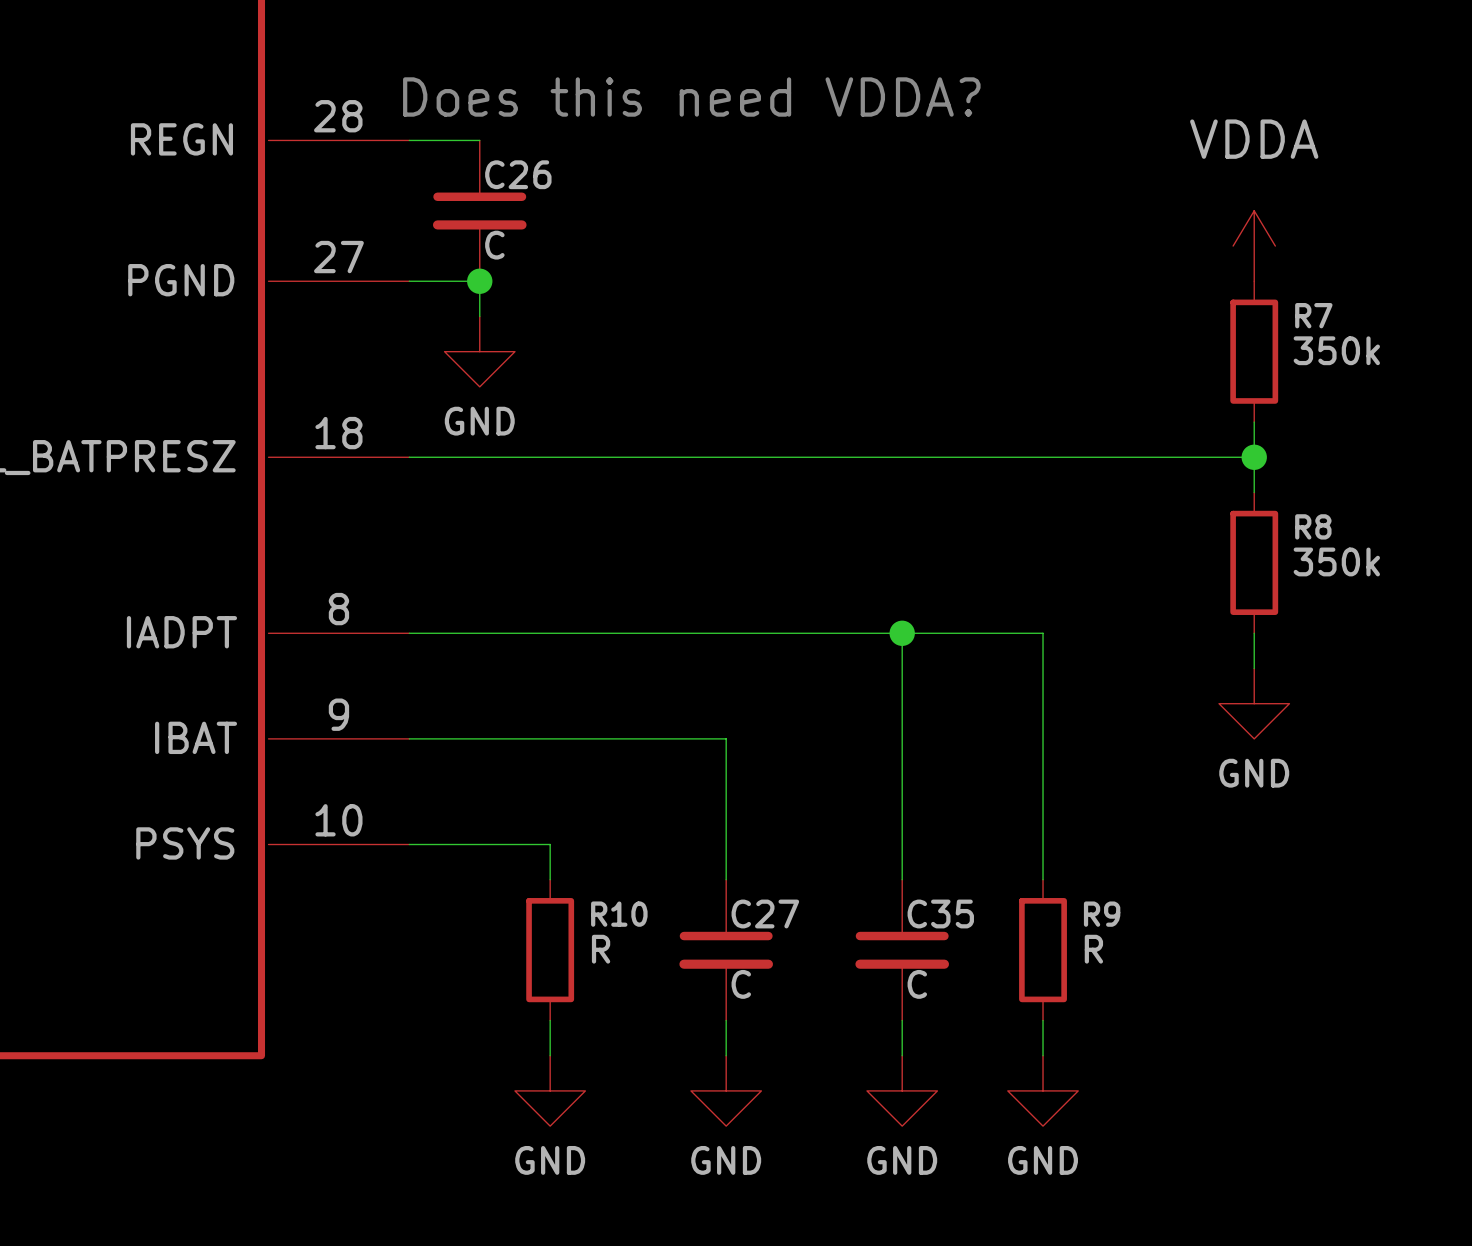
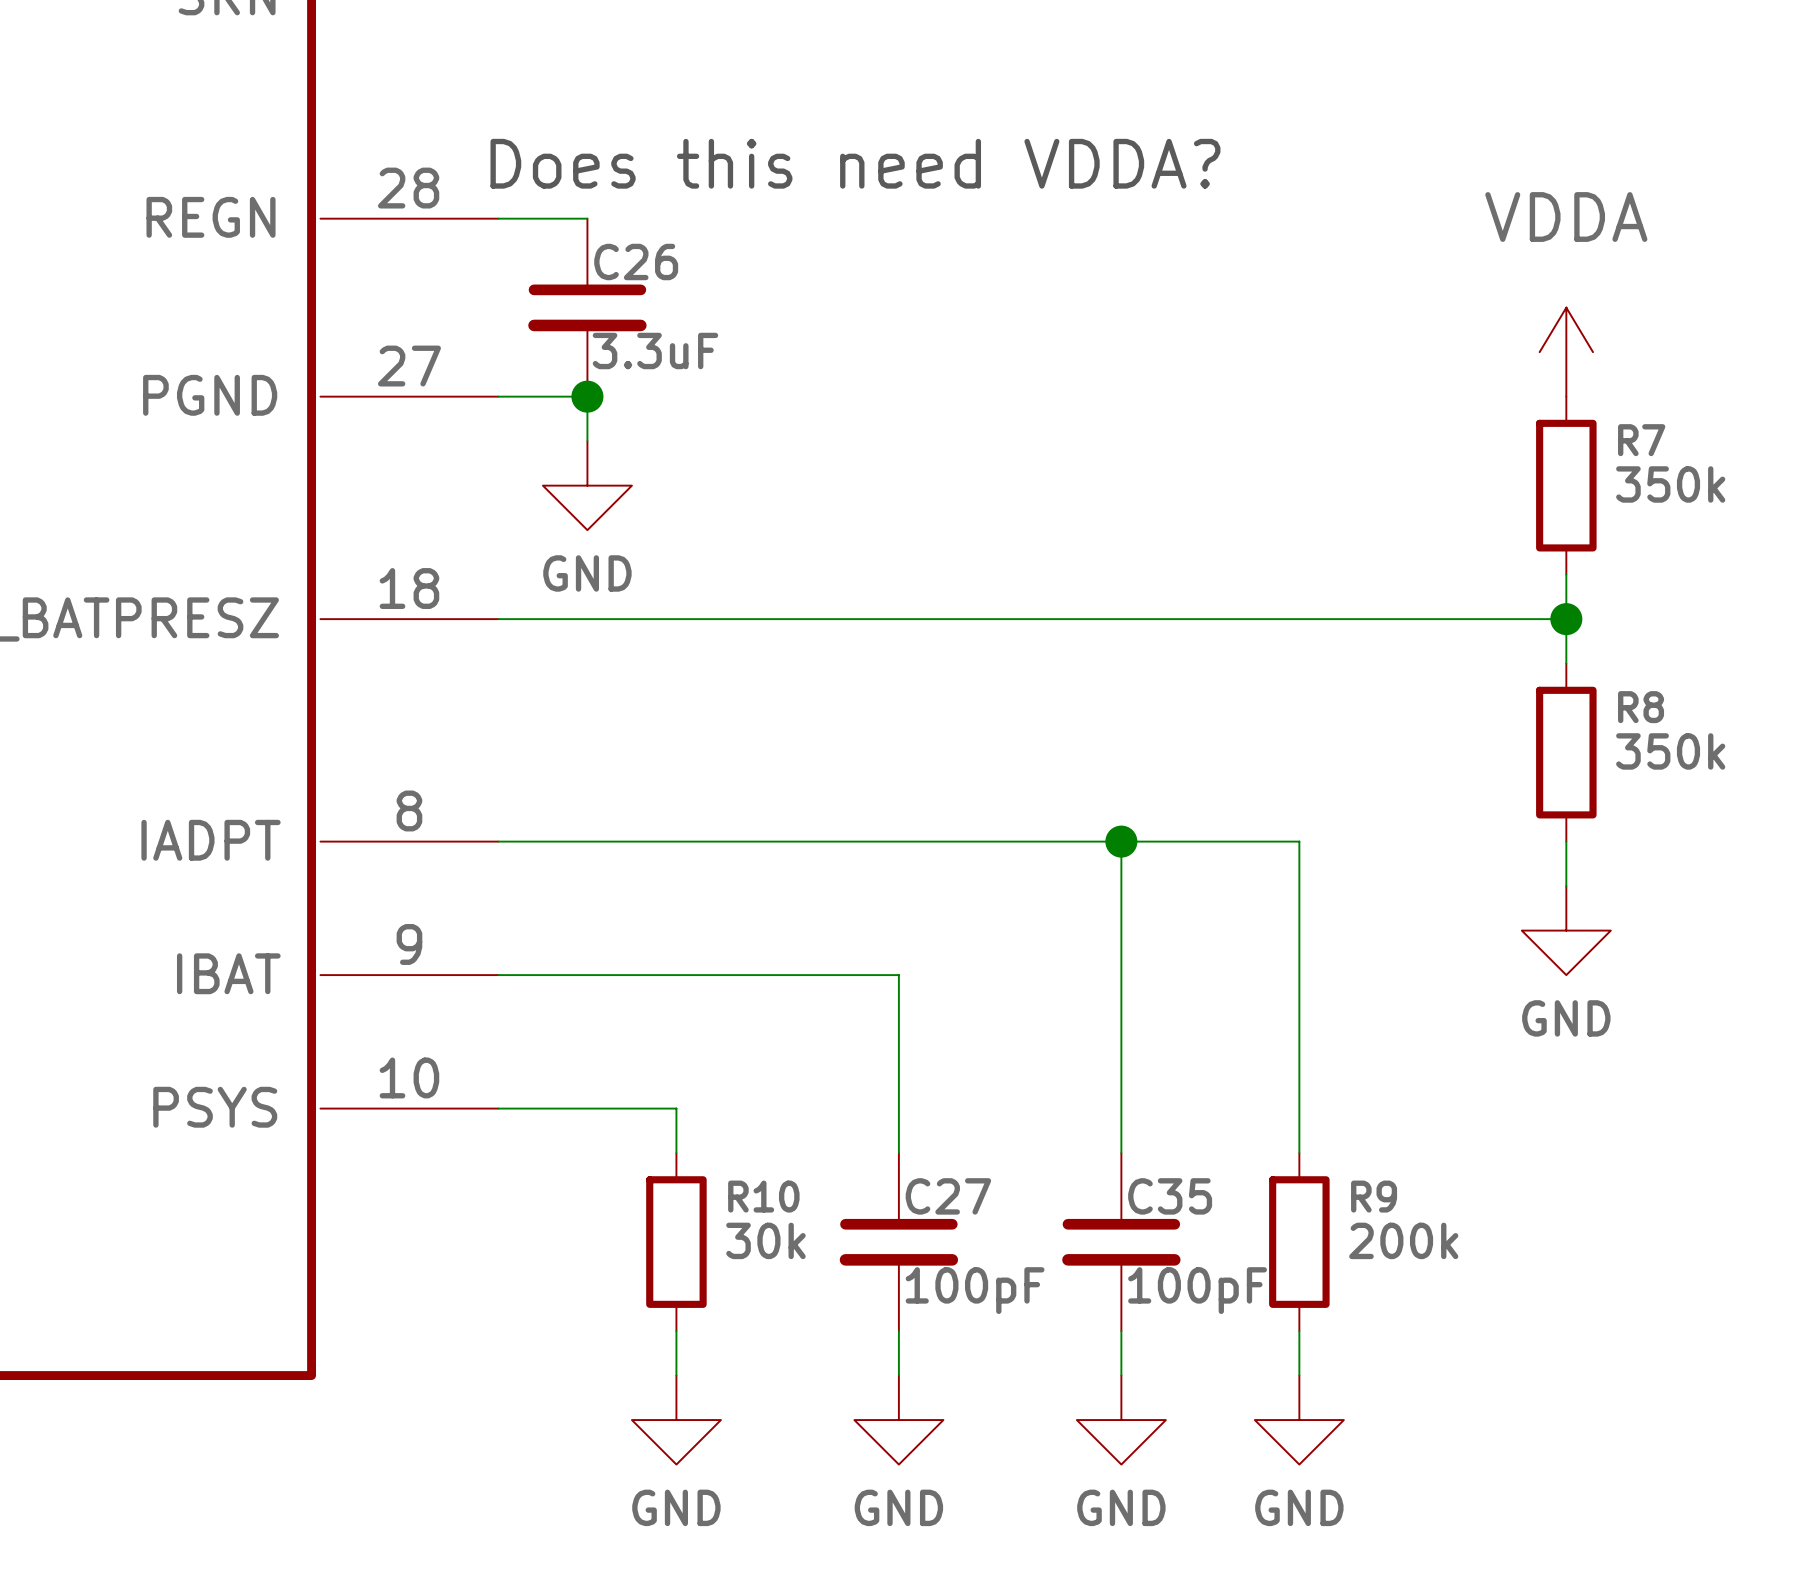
C26 value: C (494, 245) -> 3.3uF (655, 350)
R10 value: R (601, 949) -> 30k (765, 1240)
R9 value: R (1093, 949) -> 200k (1403, 1240)
C27 value: C (741, 984) -> 100pF (975, 1290)
C35 value: C (917, 984) -> 100pF (1197, 1290)

